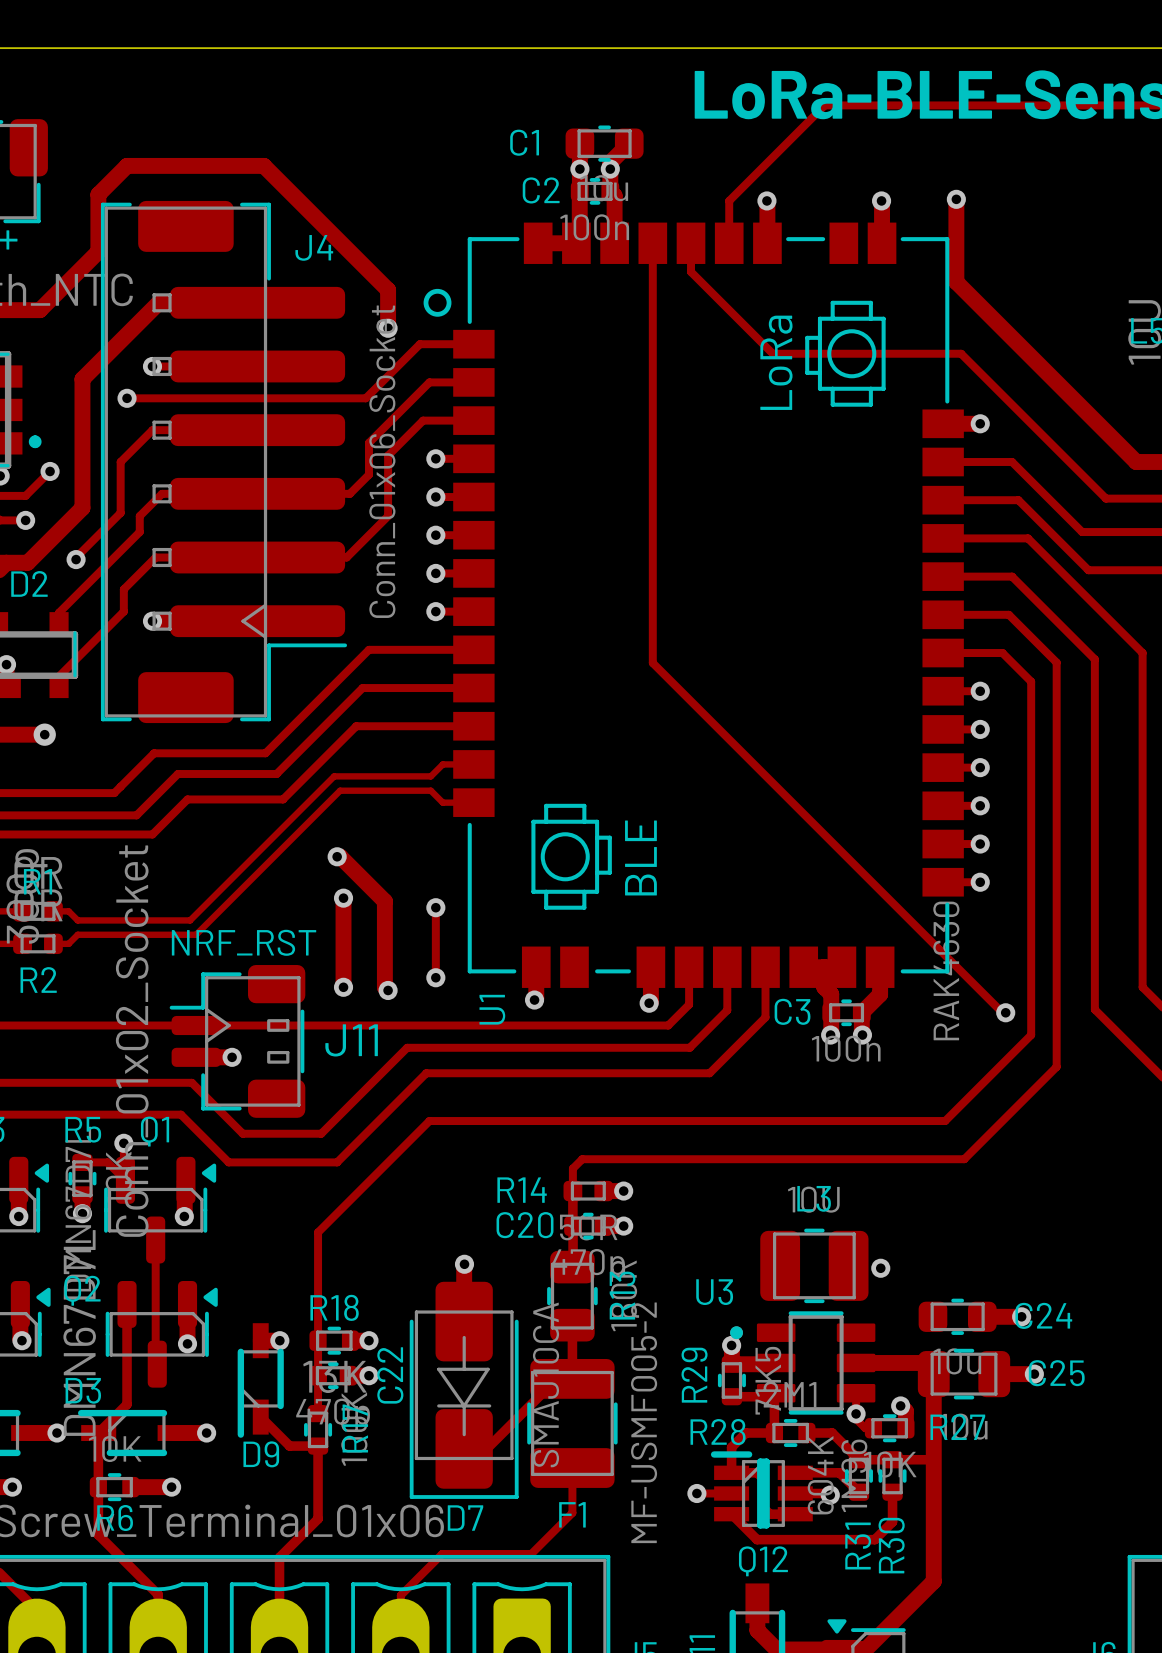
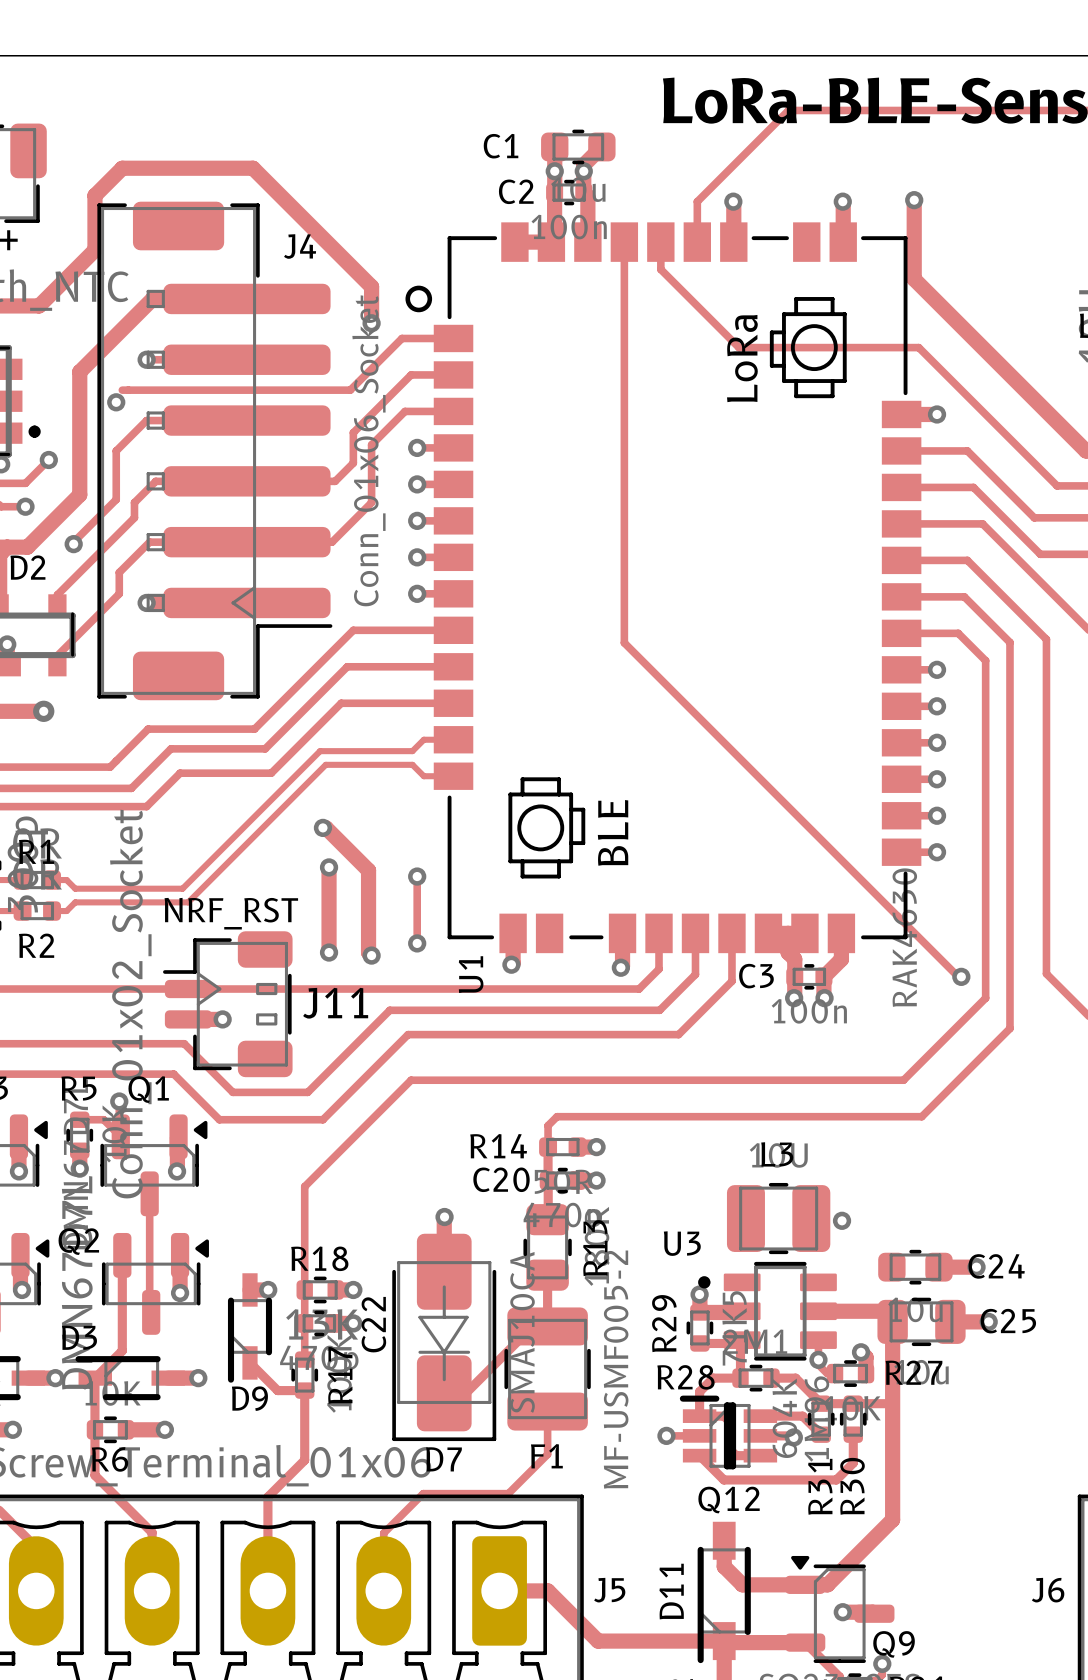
via position: (127, 398) -> (116, 402)

